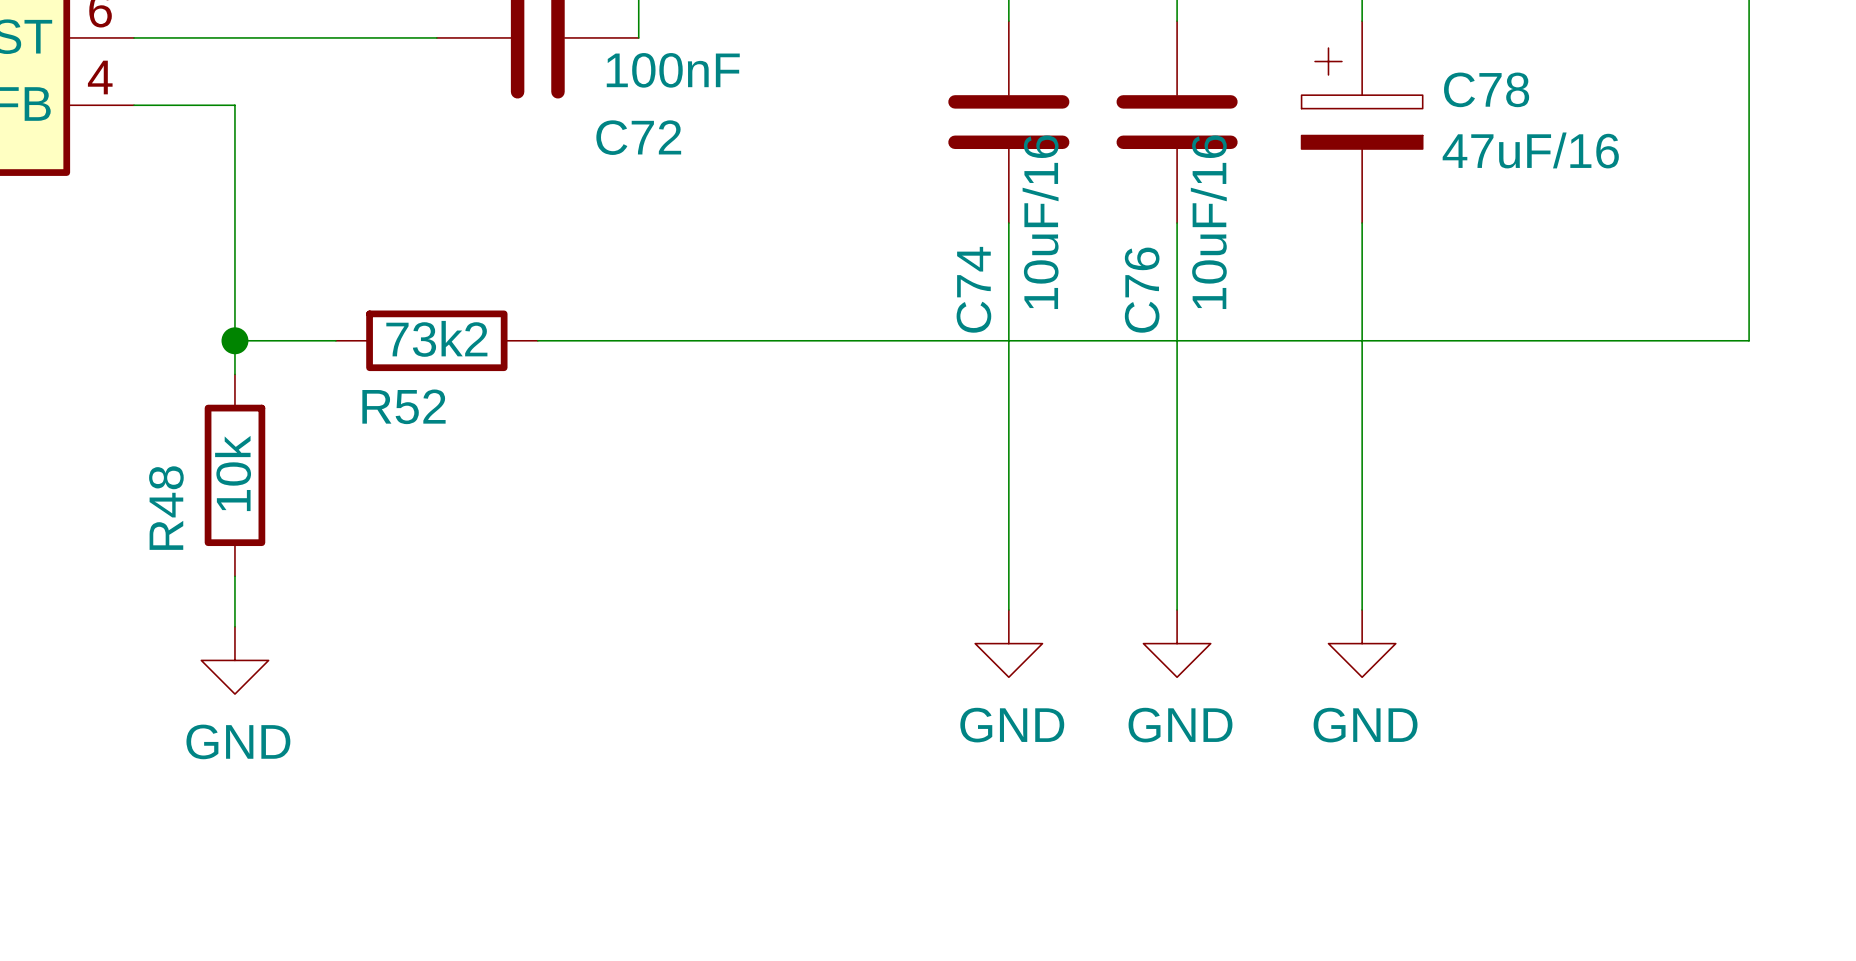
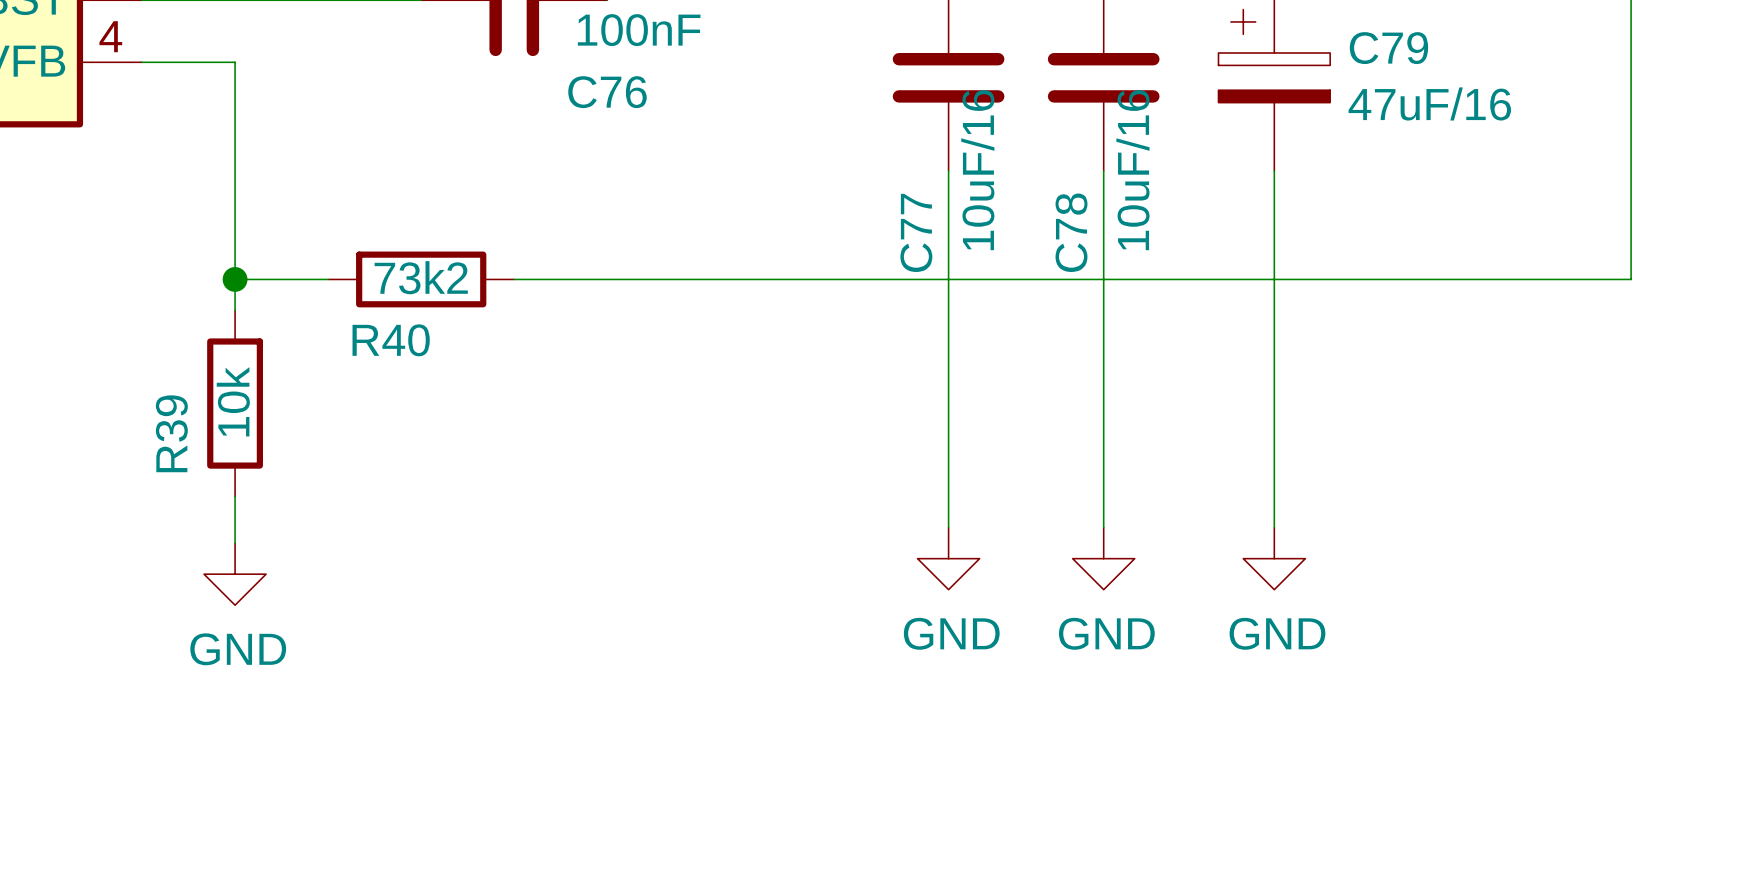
C78 name: C78 (1486, 89) -> C79 (1388, 48)
C72 name: C72 (638, 137) -> C76 (607, 92)
C74 name: C74 (973, 289) -> C77 (916, 232)
C76 name: C76 (1142, 290) -> C78 (1071, 232)
R52 name: R52 (403, 406) -> R40 (391, 340)
R48 name: R48 (166, 508) -> R39 (171, 433)

